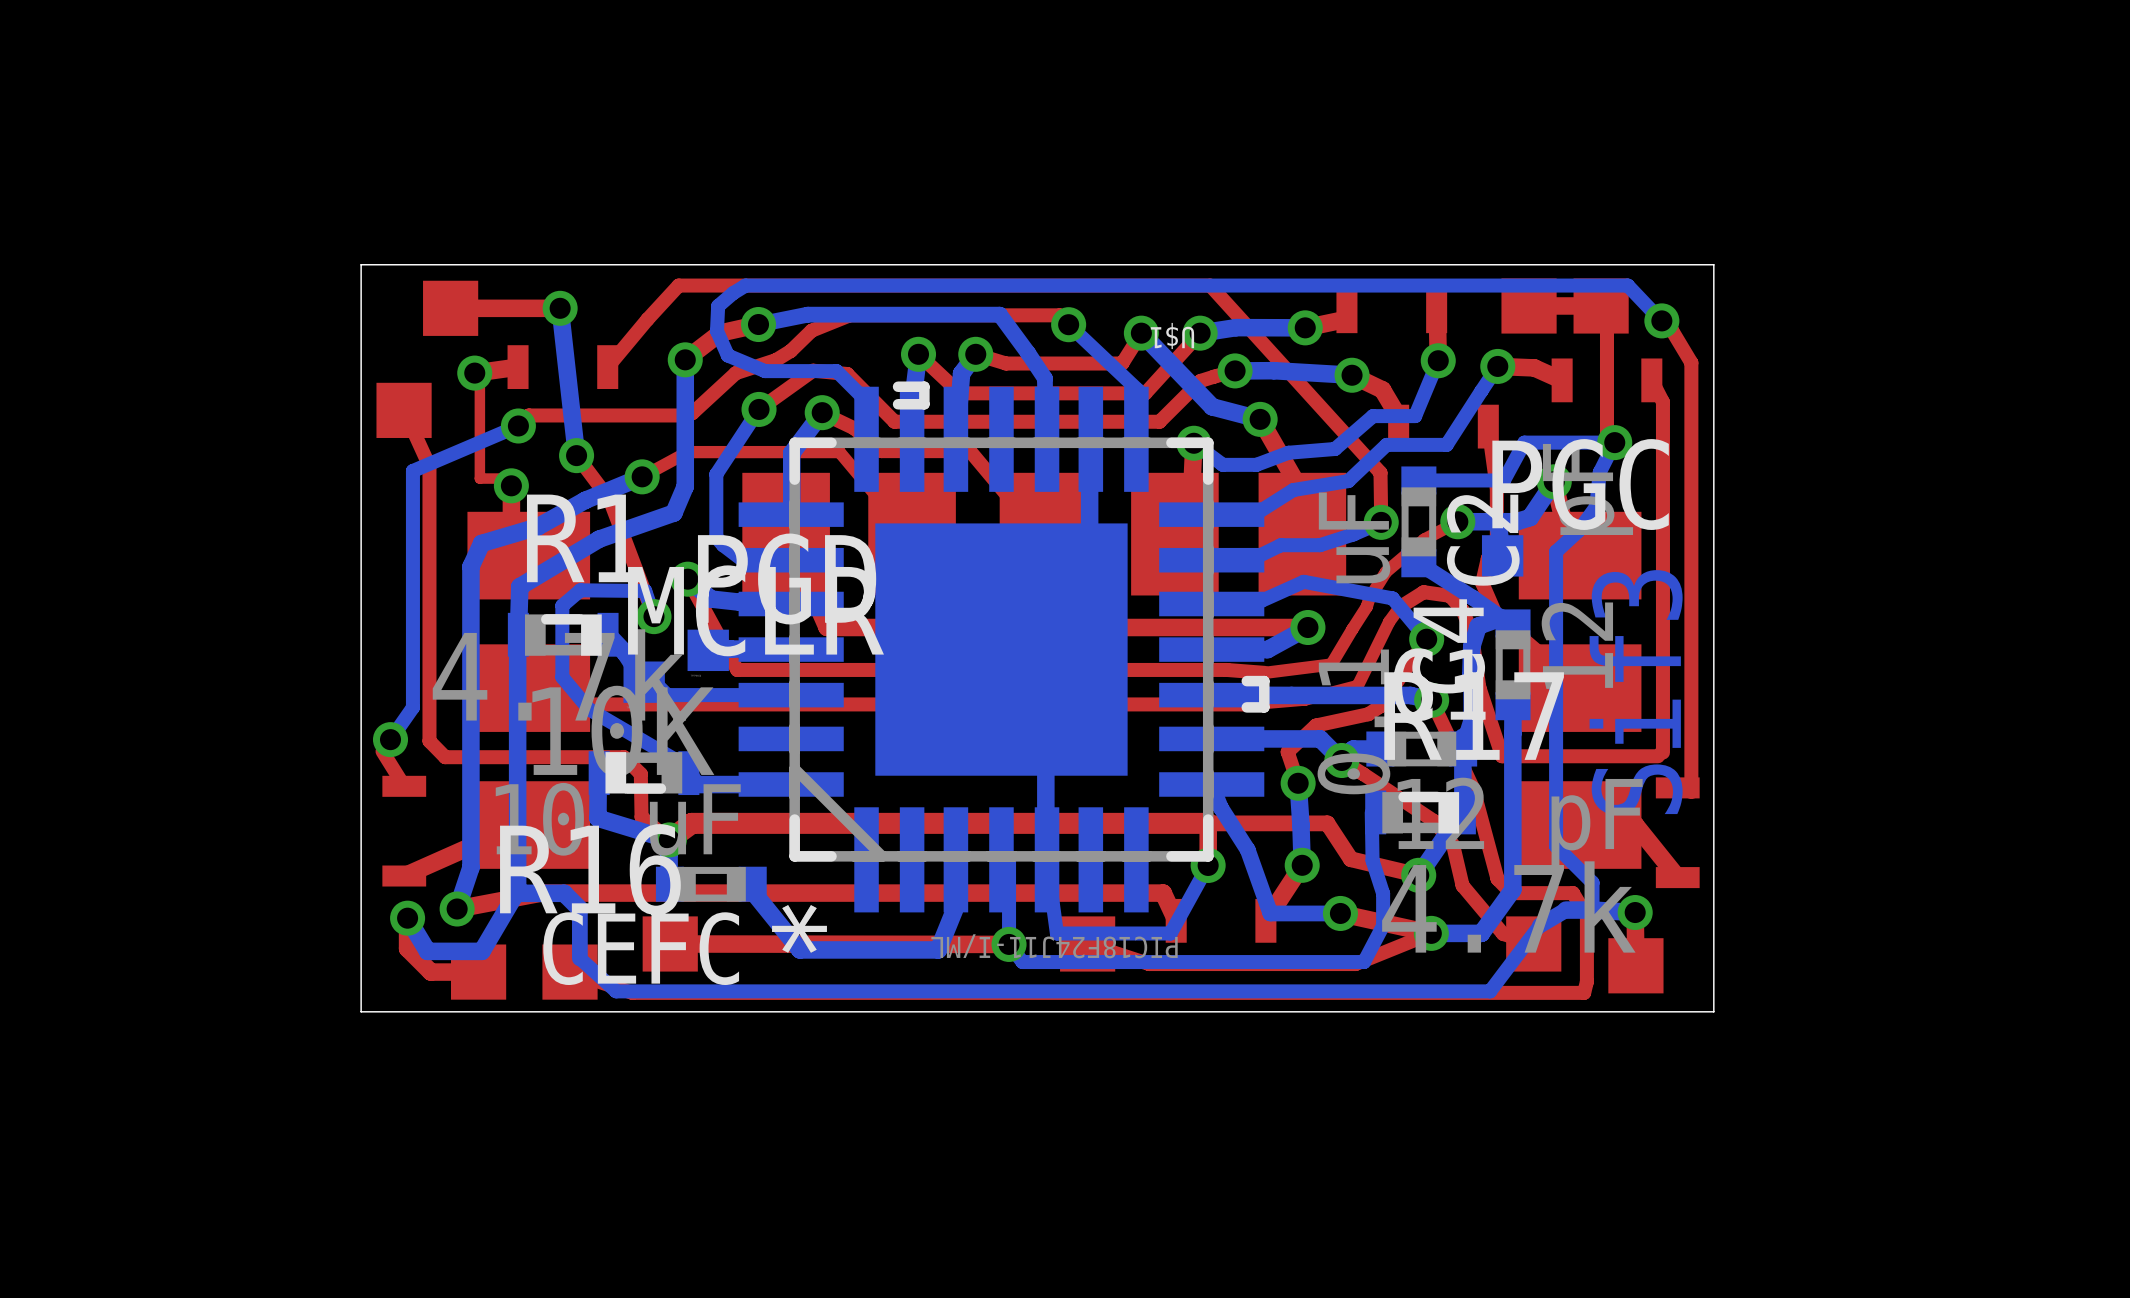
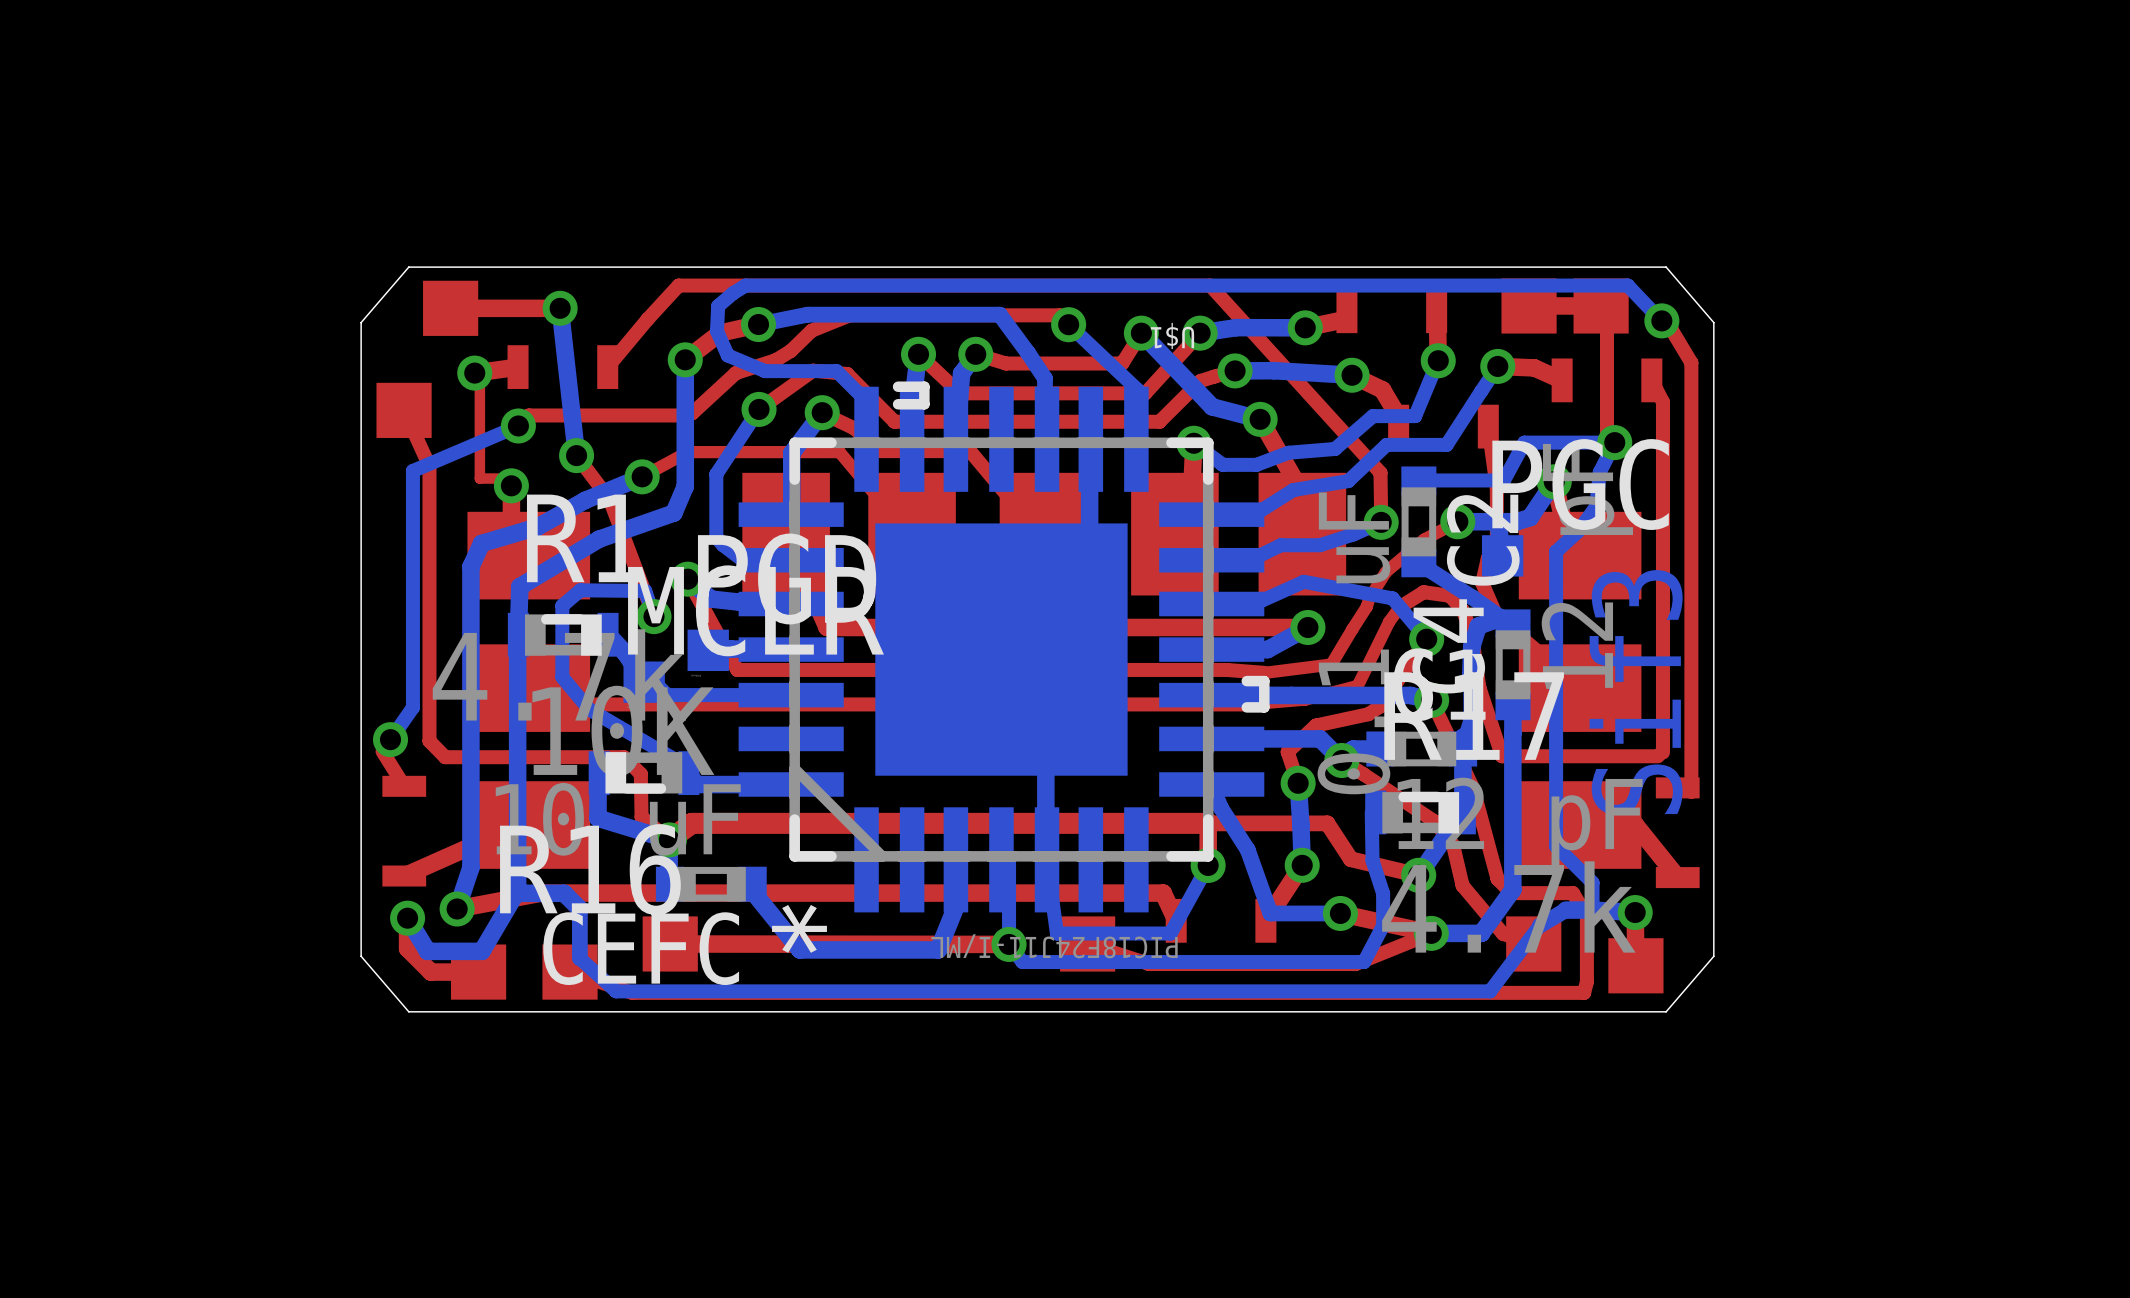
board edge: (1713, 322) (1713, 264) (361, 264) (361, 322) -> (1713, 322) (1666, 267) (408, 267) (361, 322)
board edge: (361, 956) (361, 1011) (408, 1011) -> (361, 956) (408, 1011)
board edge: (1713, 956) (1713, 1011) (1666, 1011) -> (1713, 956) (1666, 1011)

